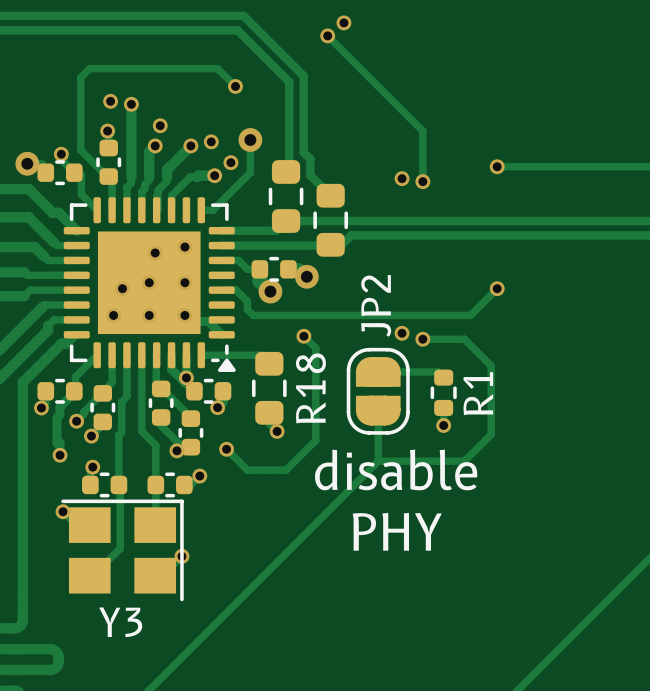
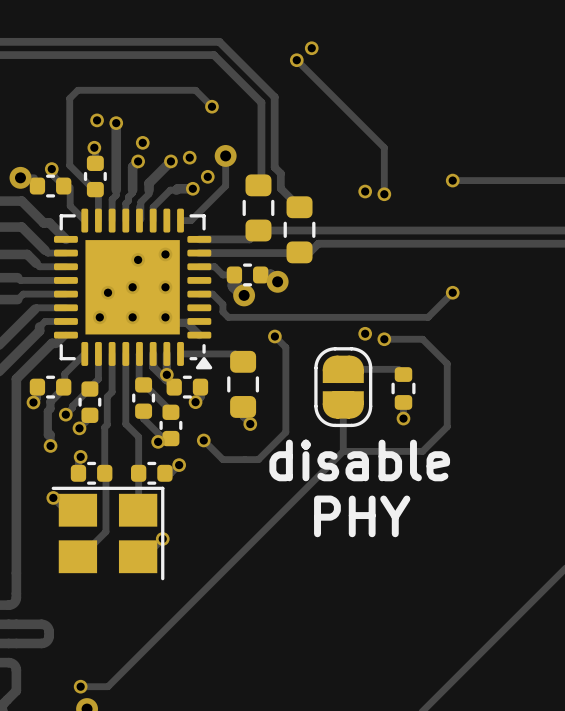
JP2 name: JP2 (376, 305) -> none
R18 name: R18 (310, 388) -> none
R1 name: R1 (478, 393) -> none
Y3 name: Y3 (120, 622) -> none

